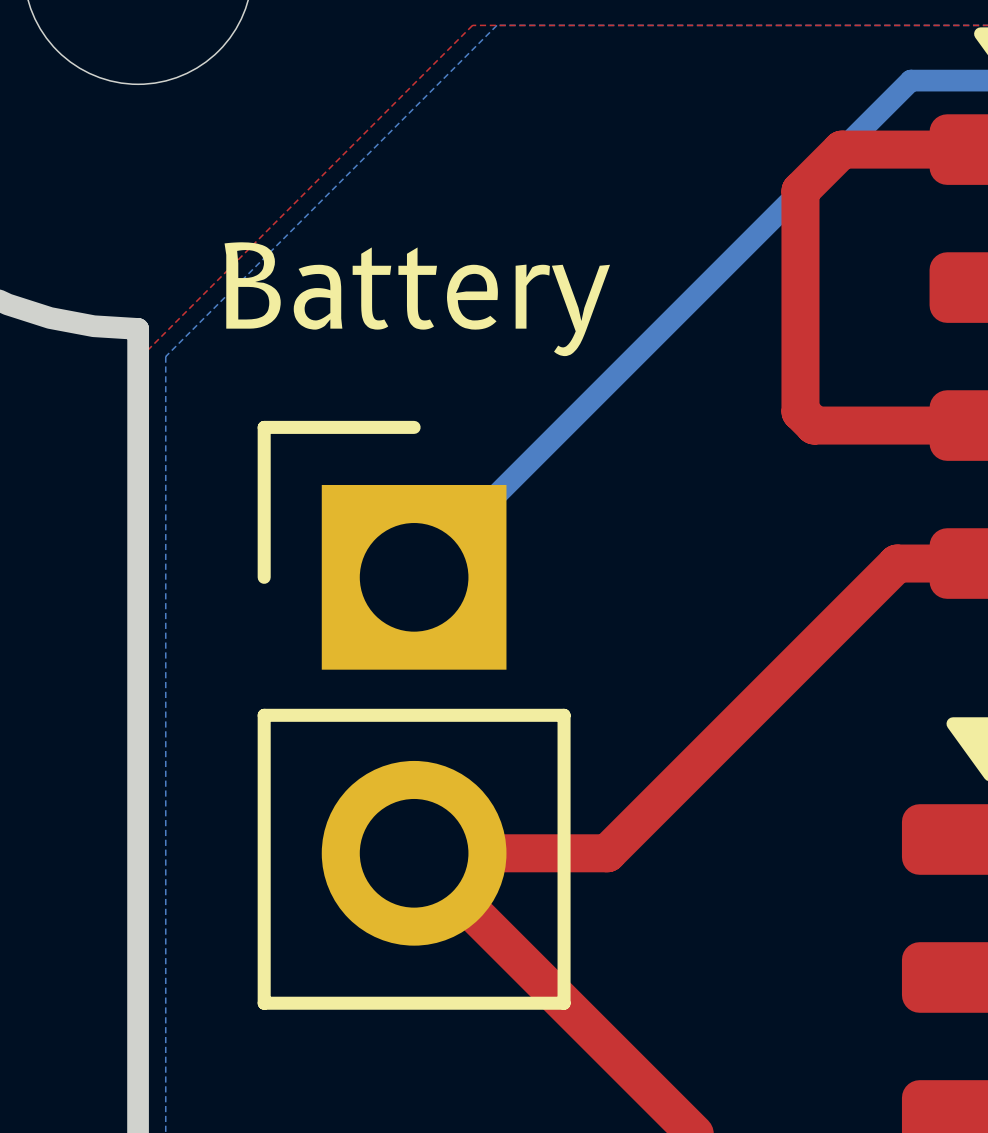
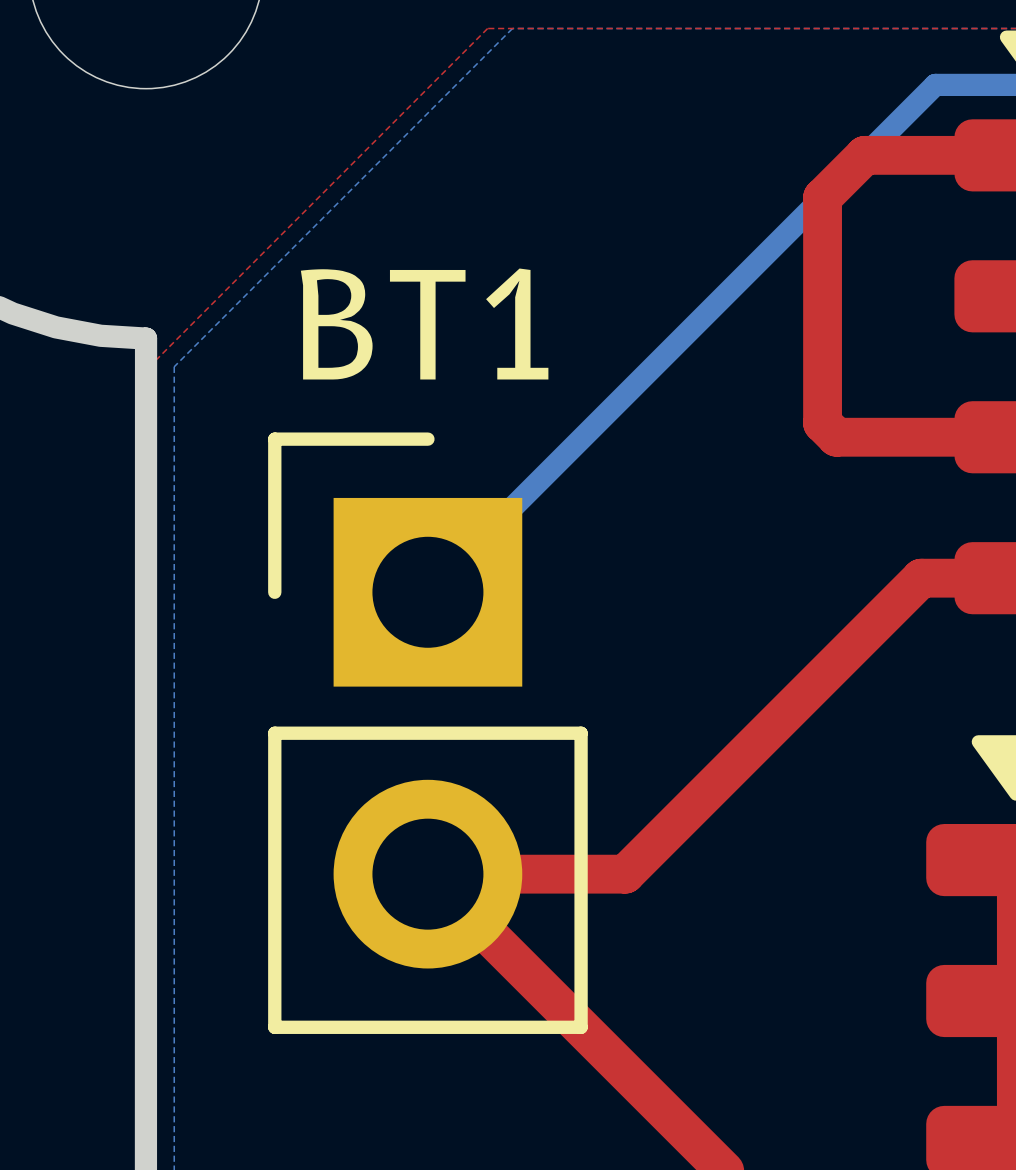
BT1 value: Battery (417, 299) -> none
BT1 name: none -> BT1 (424, 324)

